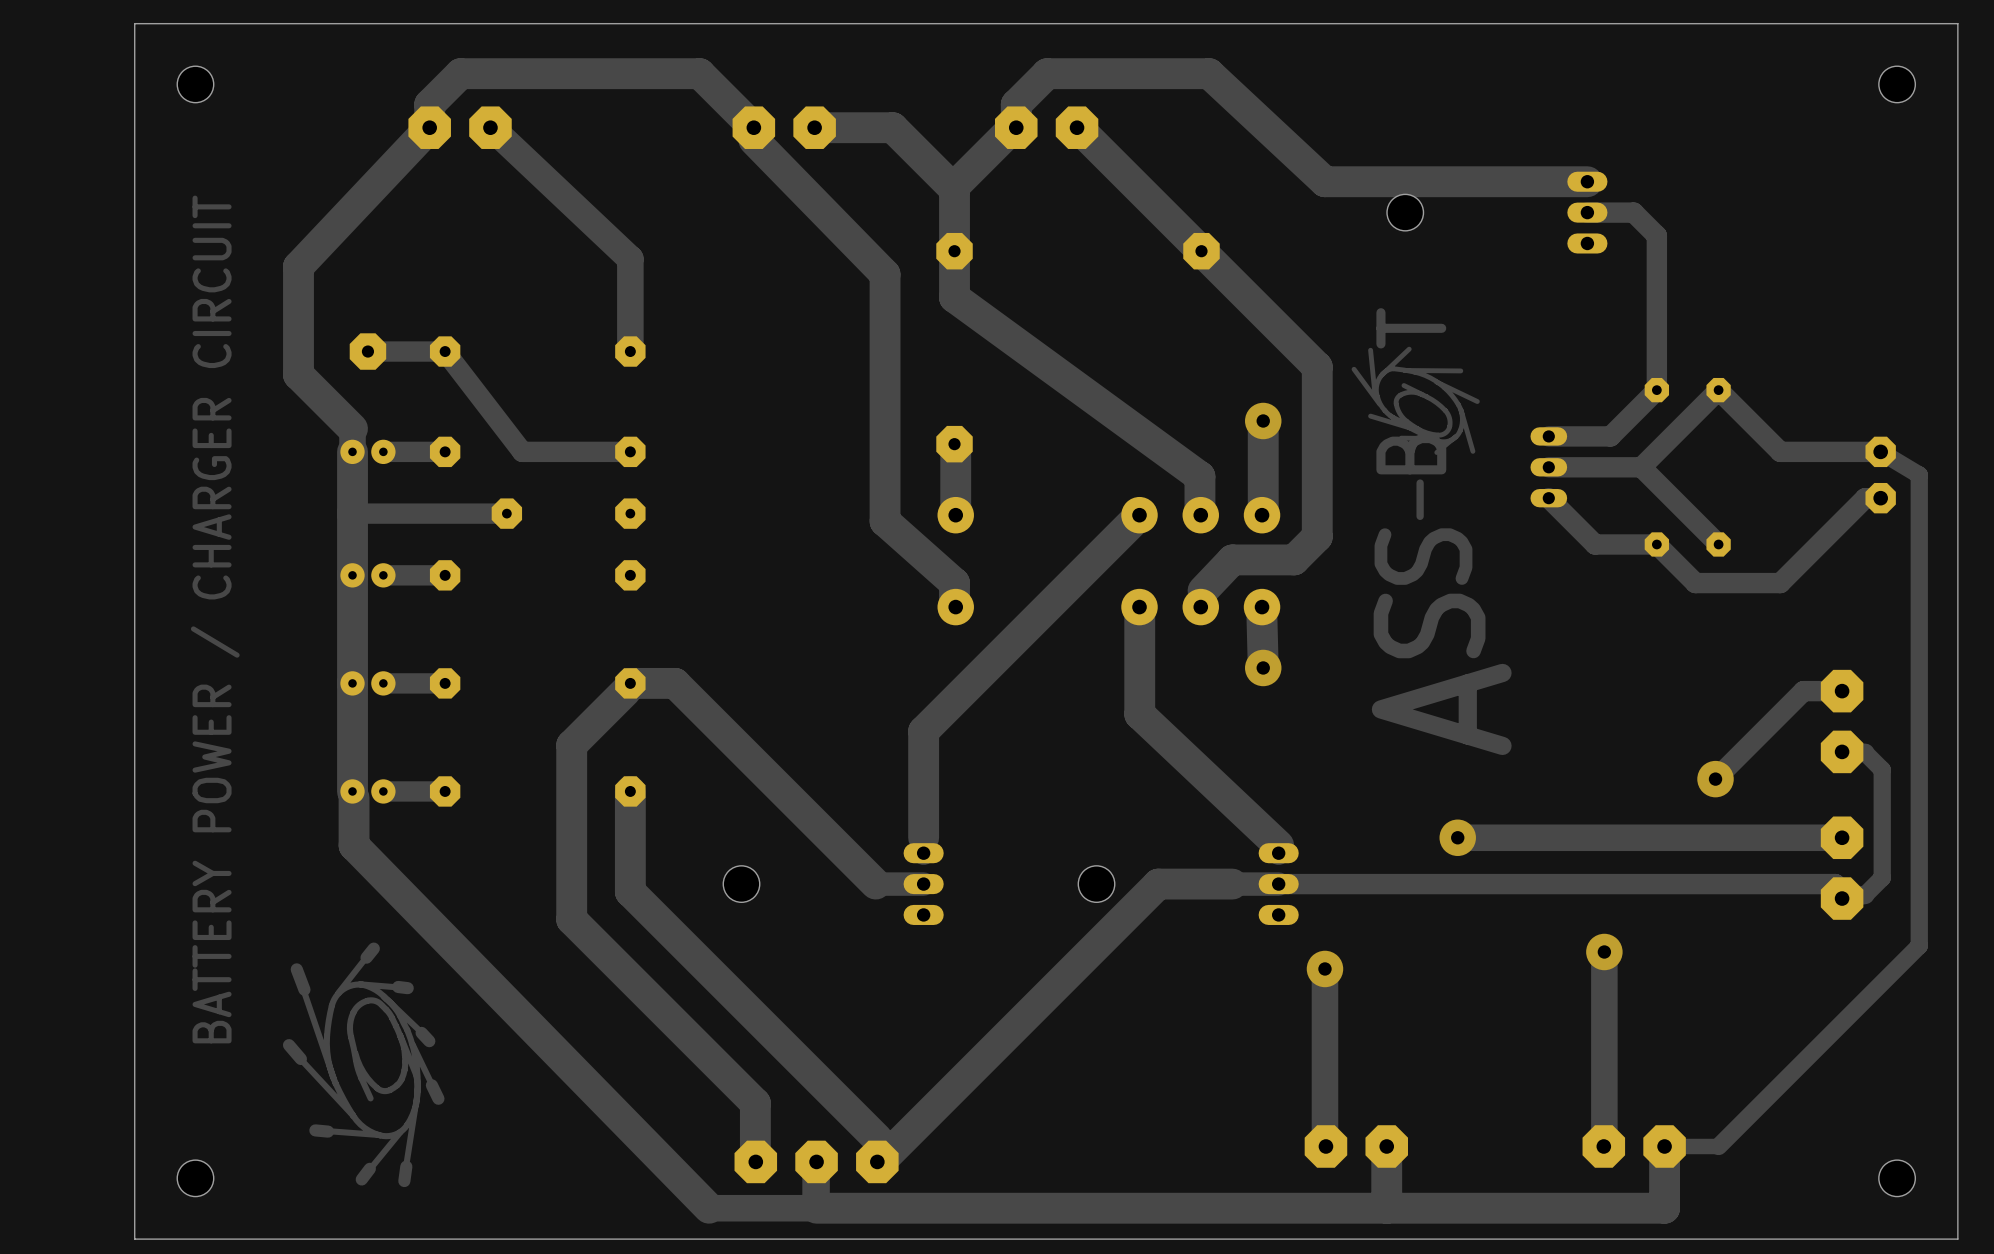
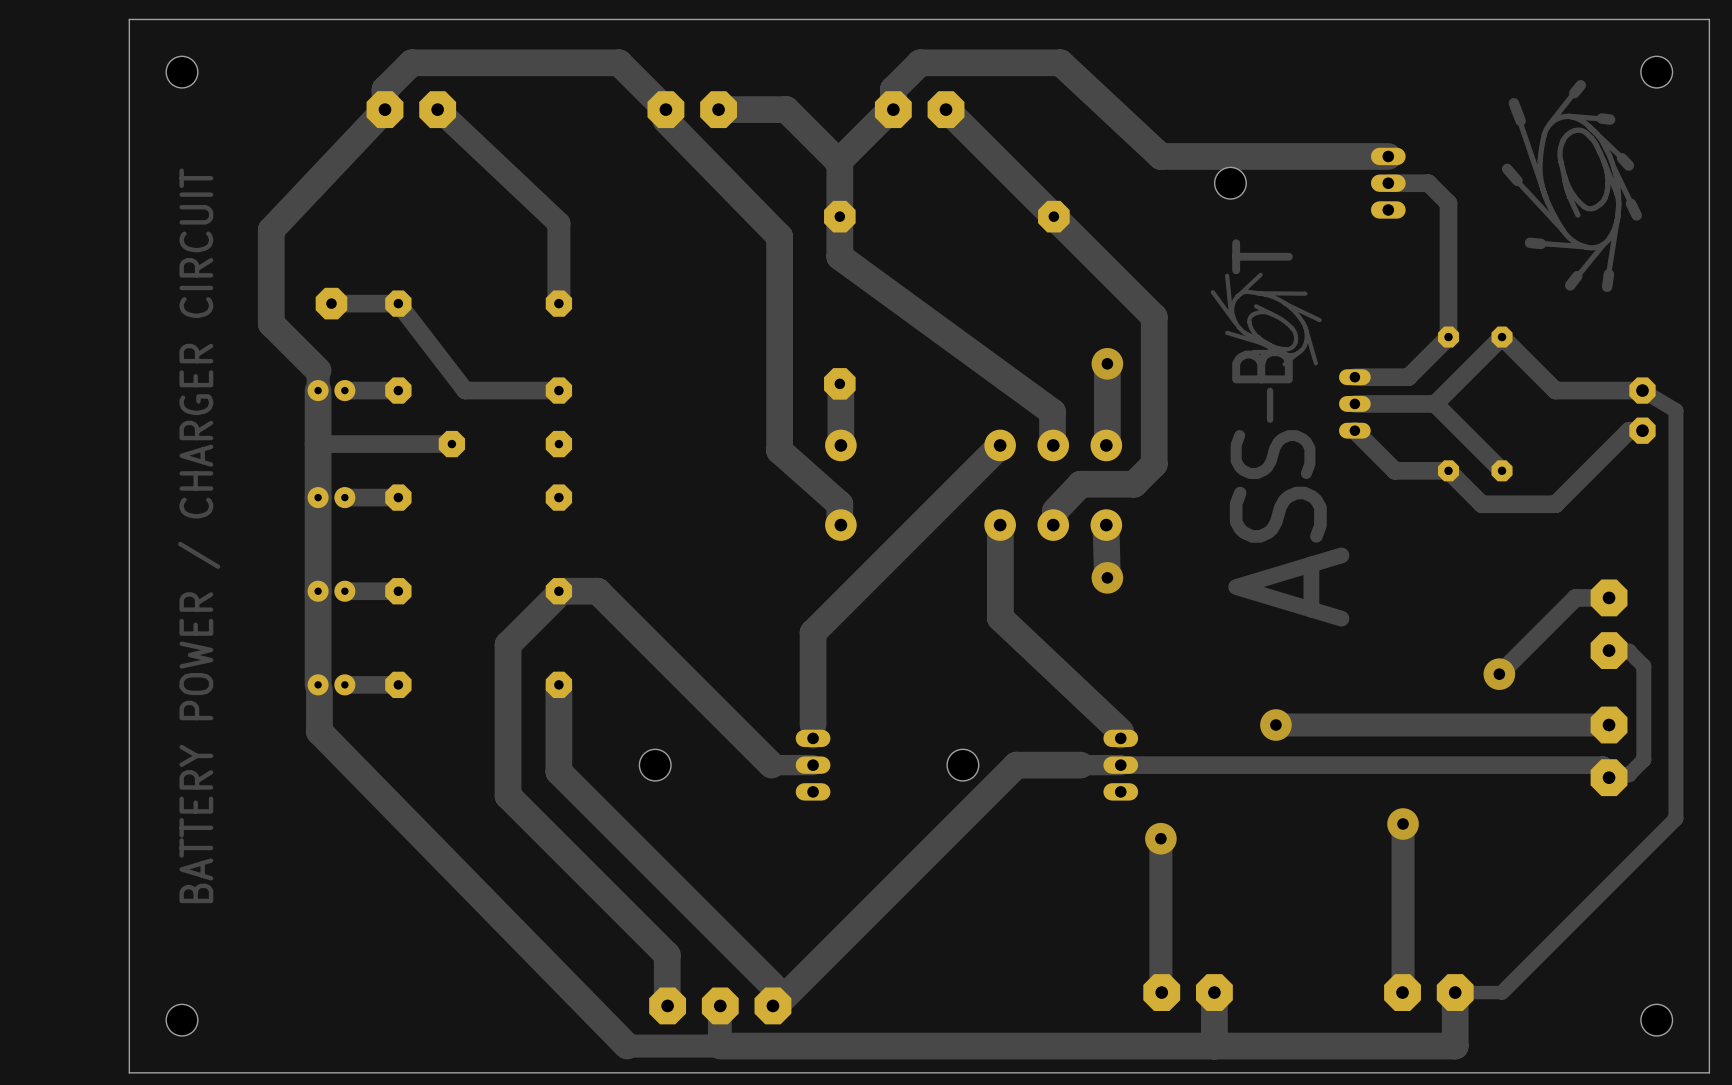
drawing: none -> [1501, 80, 1642, 293]
drawing position: (1415, 400) -> (1266, 319)
drawing: [282, 942, 445, 1188] -> none

